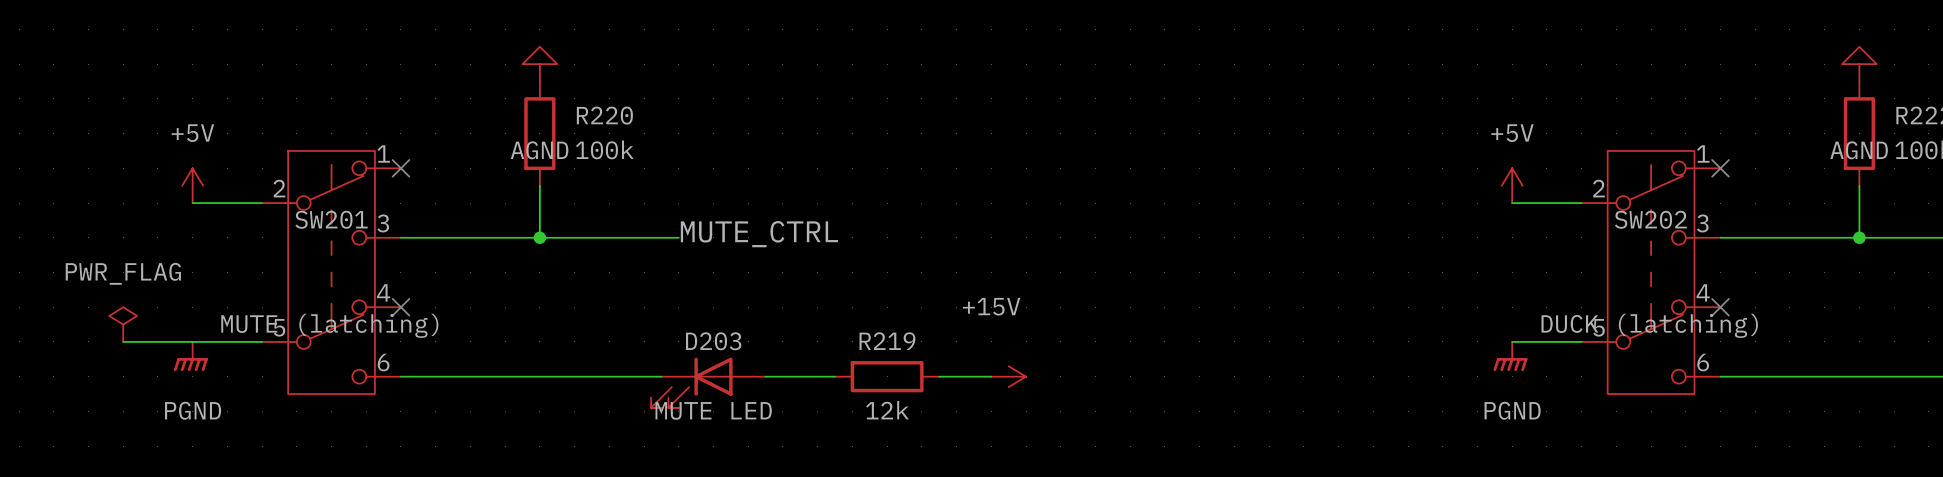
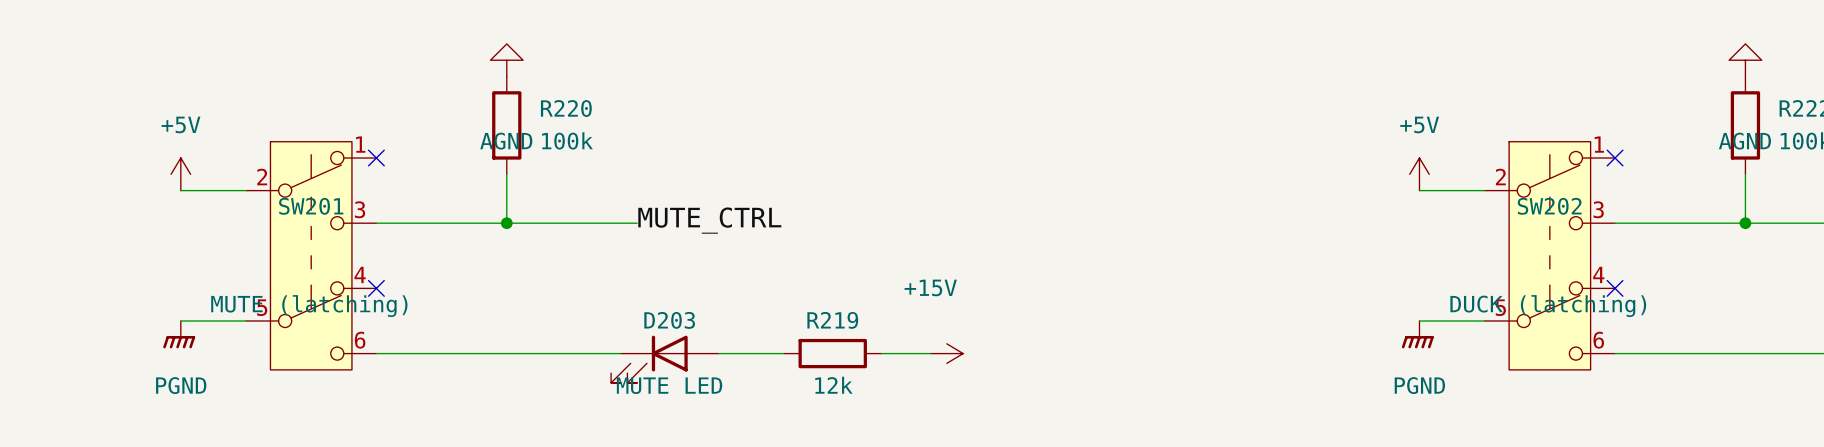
power symbol: PWR_FLAG (123, 324) -> none
wire: (123, 341) (192, 341) -> none

